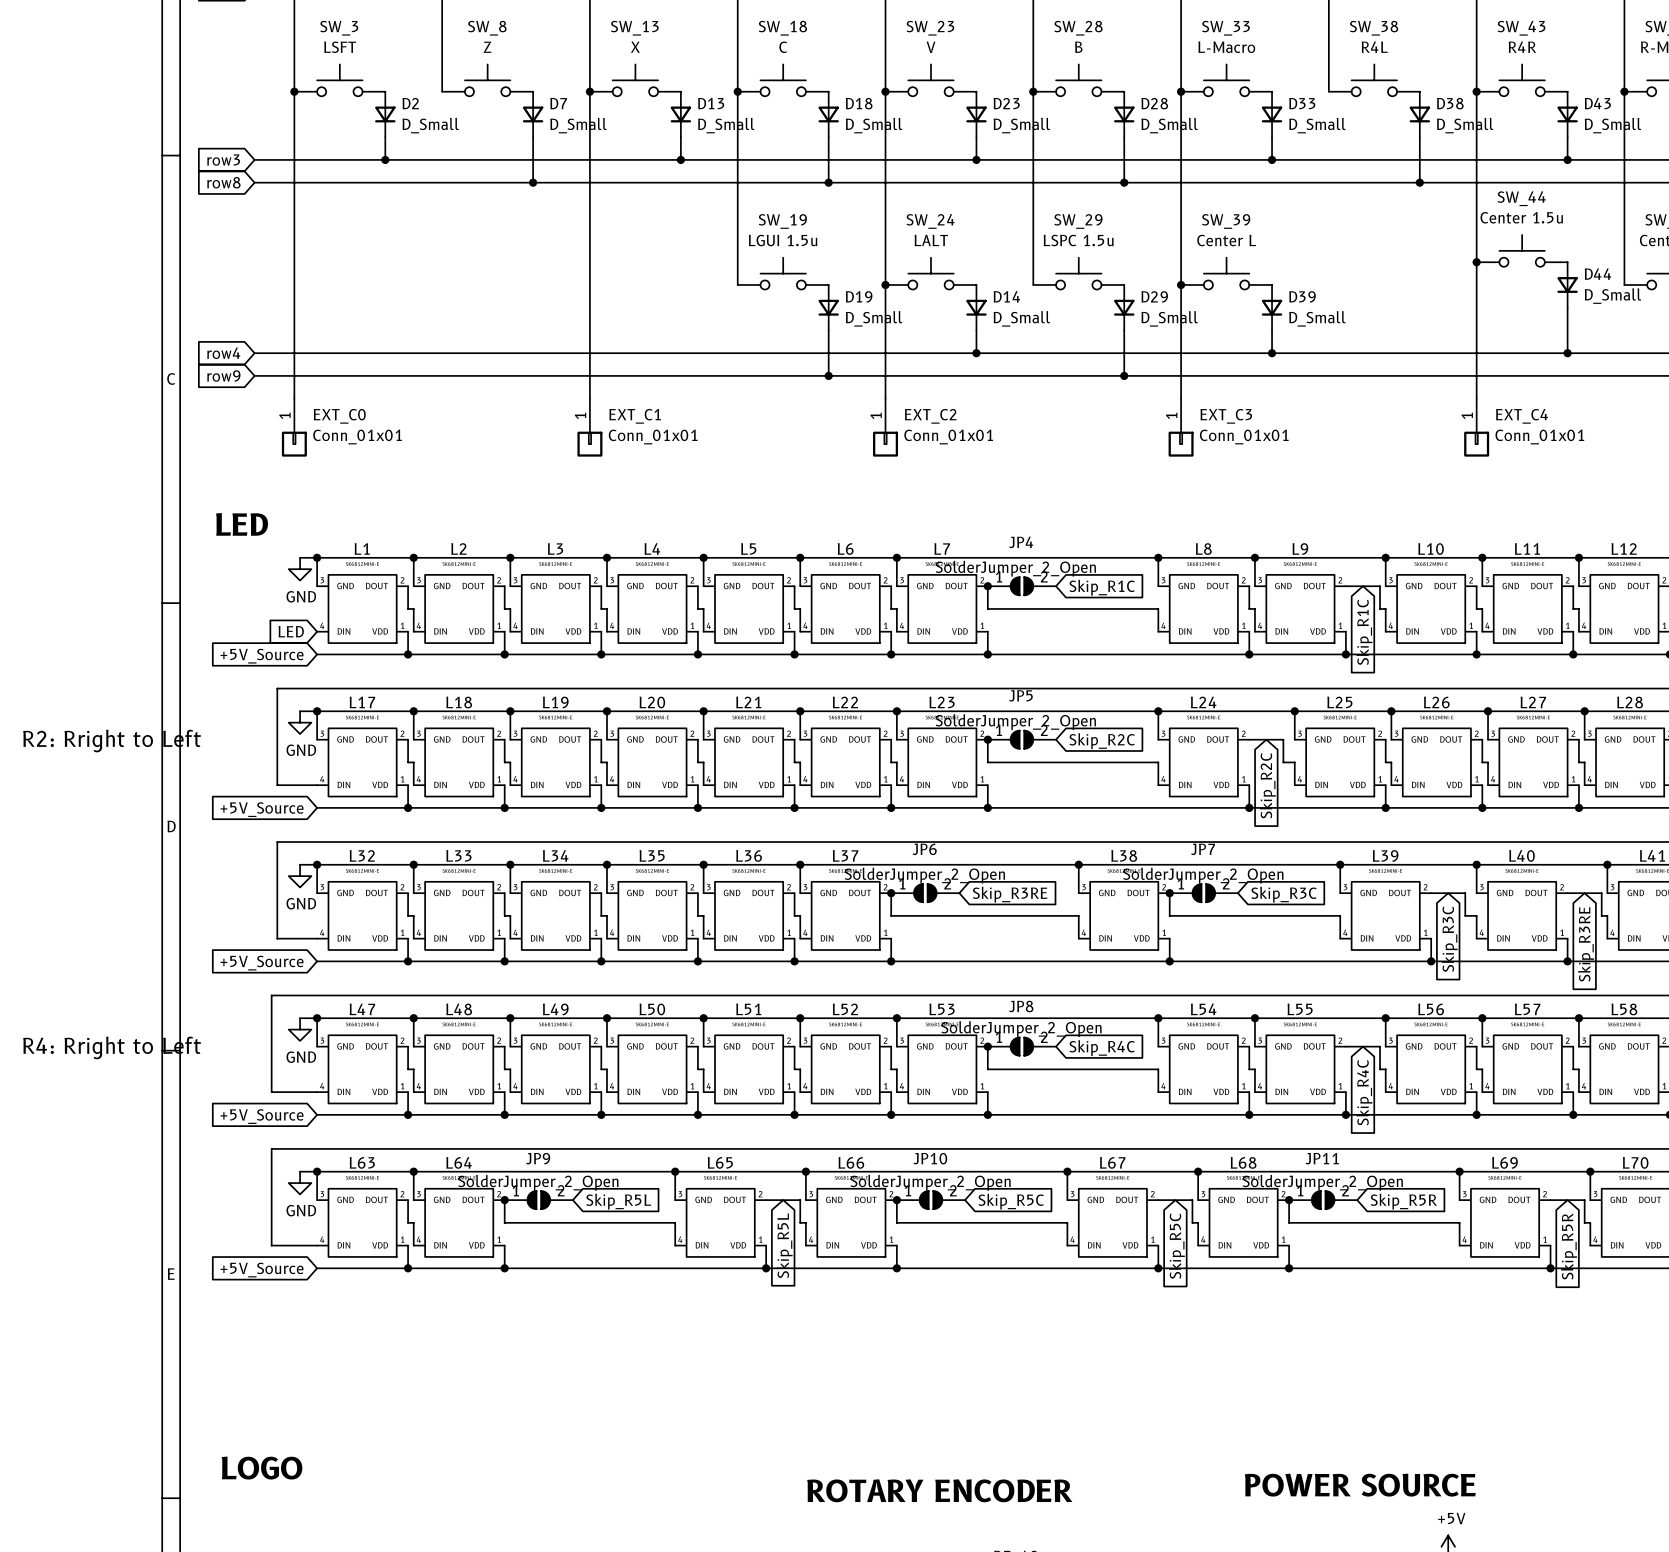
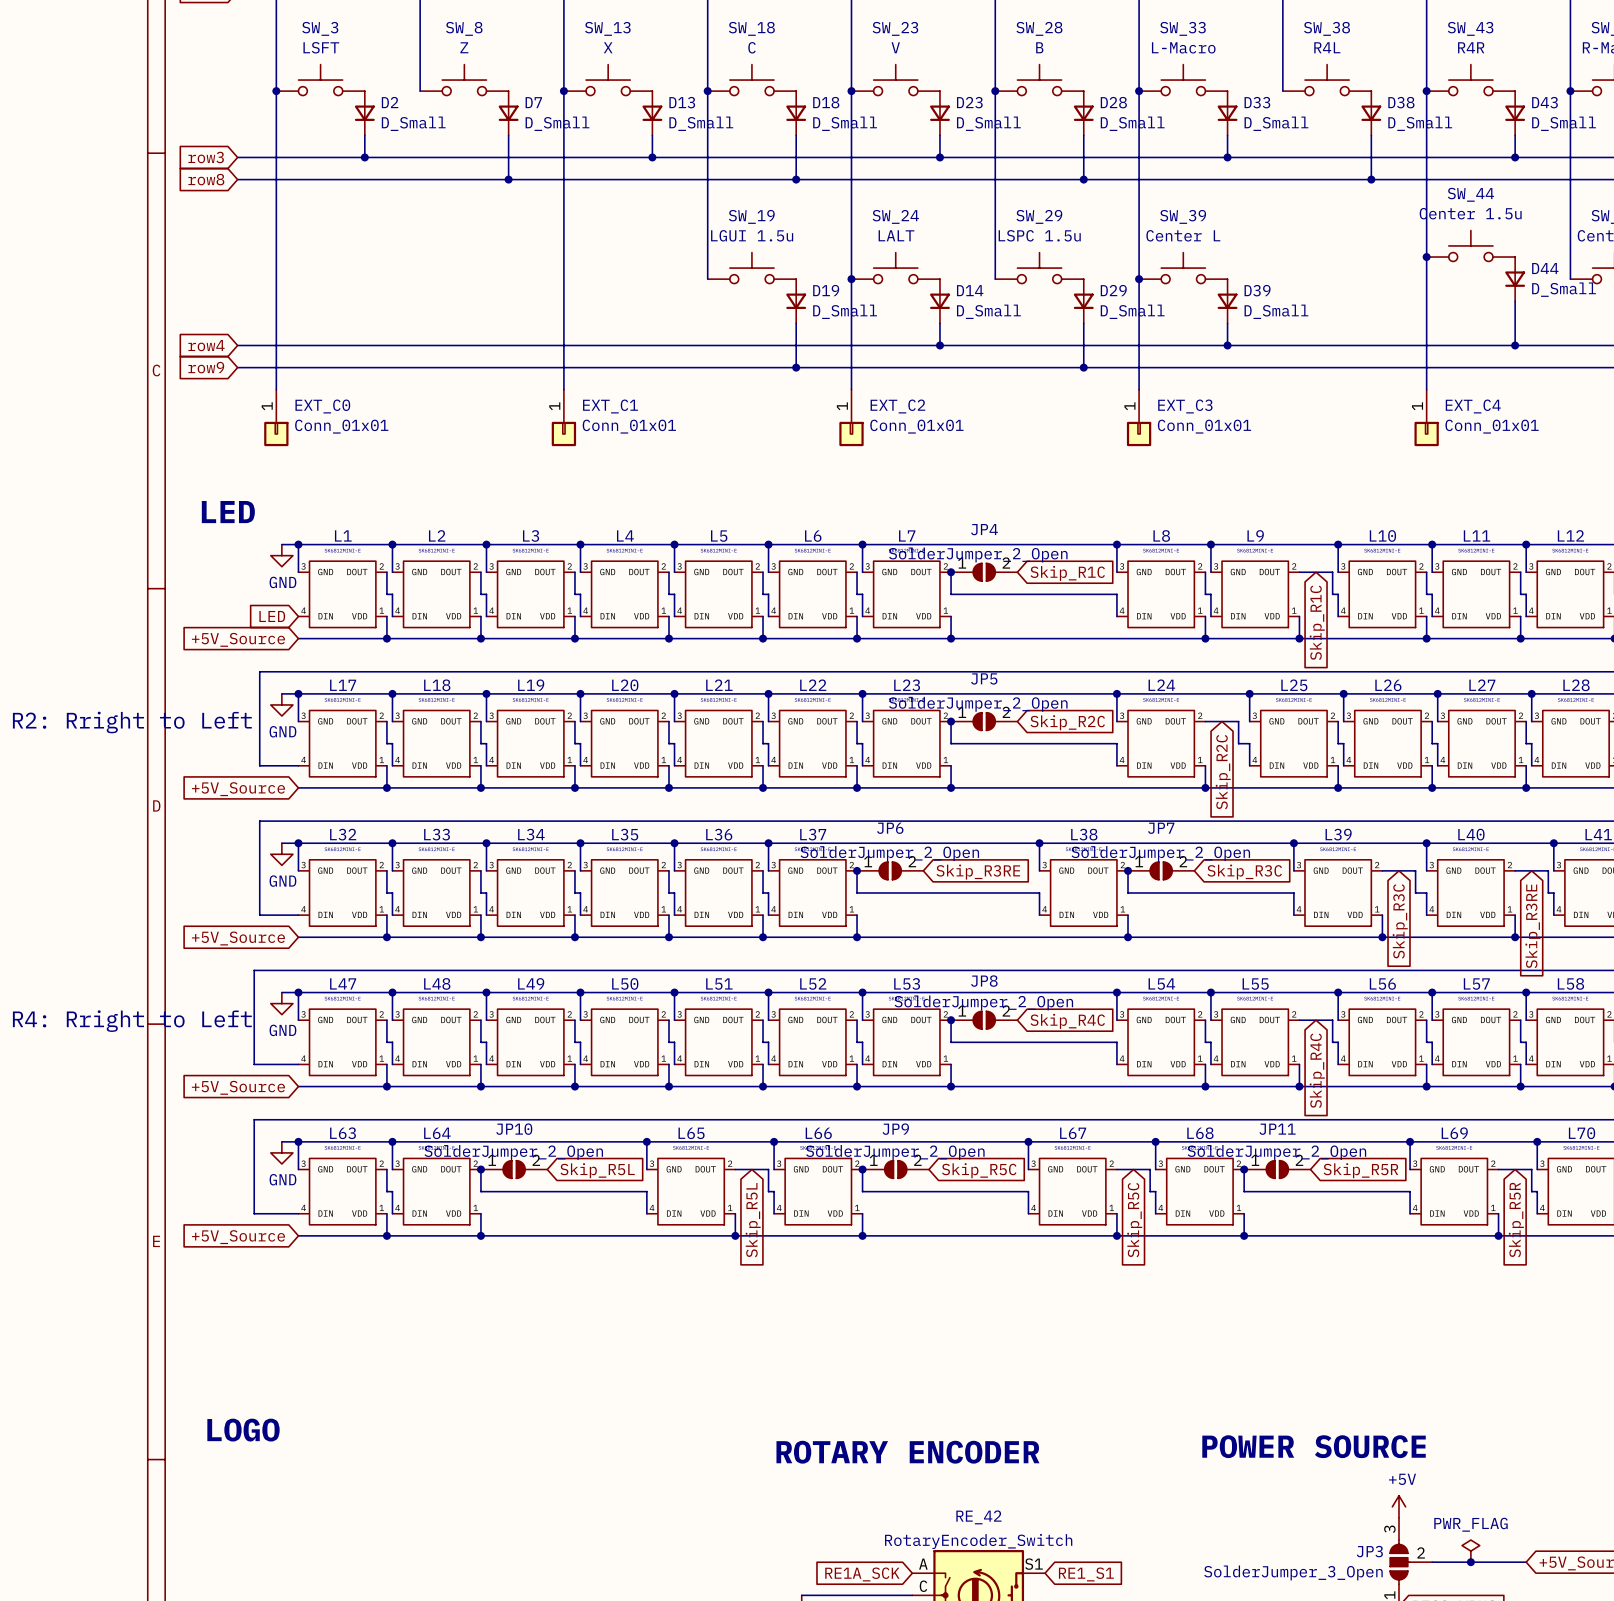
JP9 name: JP9 (538, 1158) -> JP10 (514, 1129)
JP10 name: JP10 (930, 1158) -> JP9 (895, 1129)

